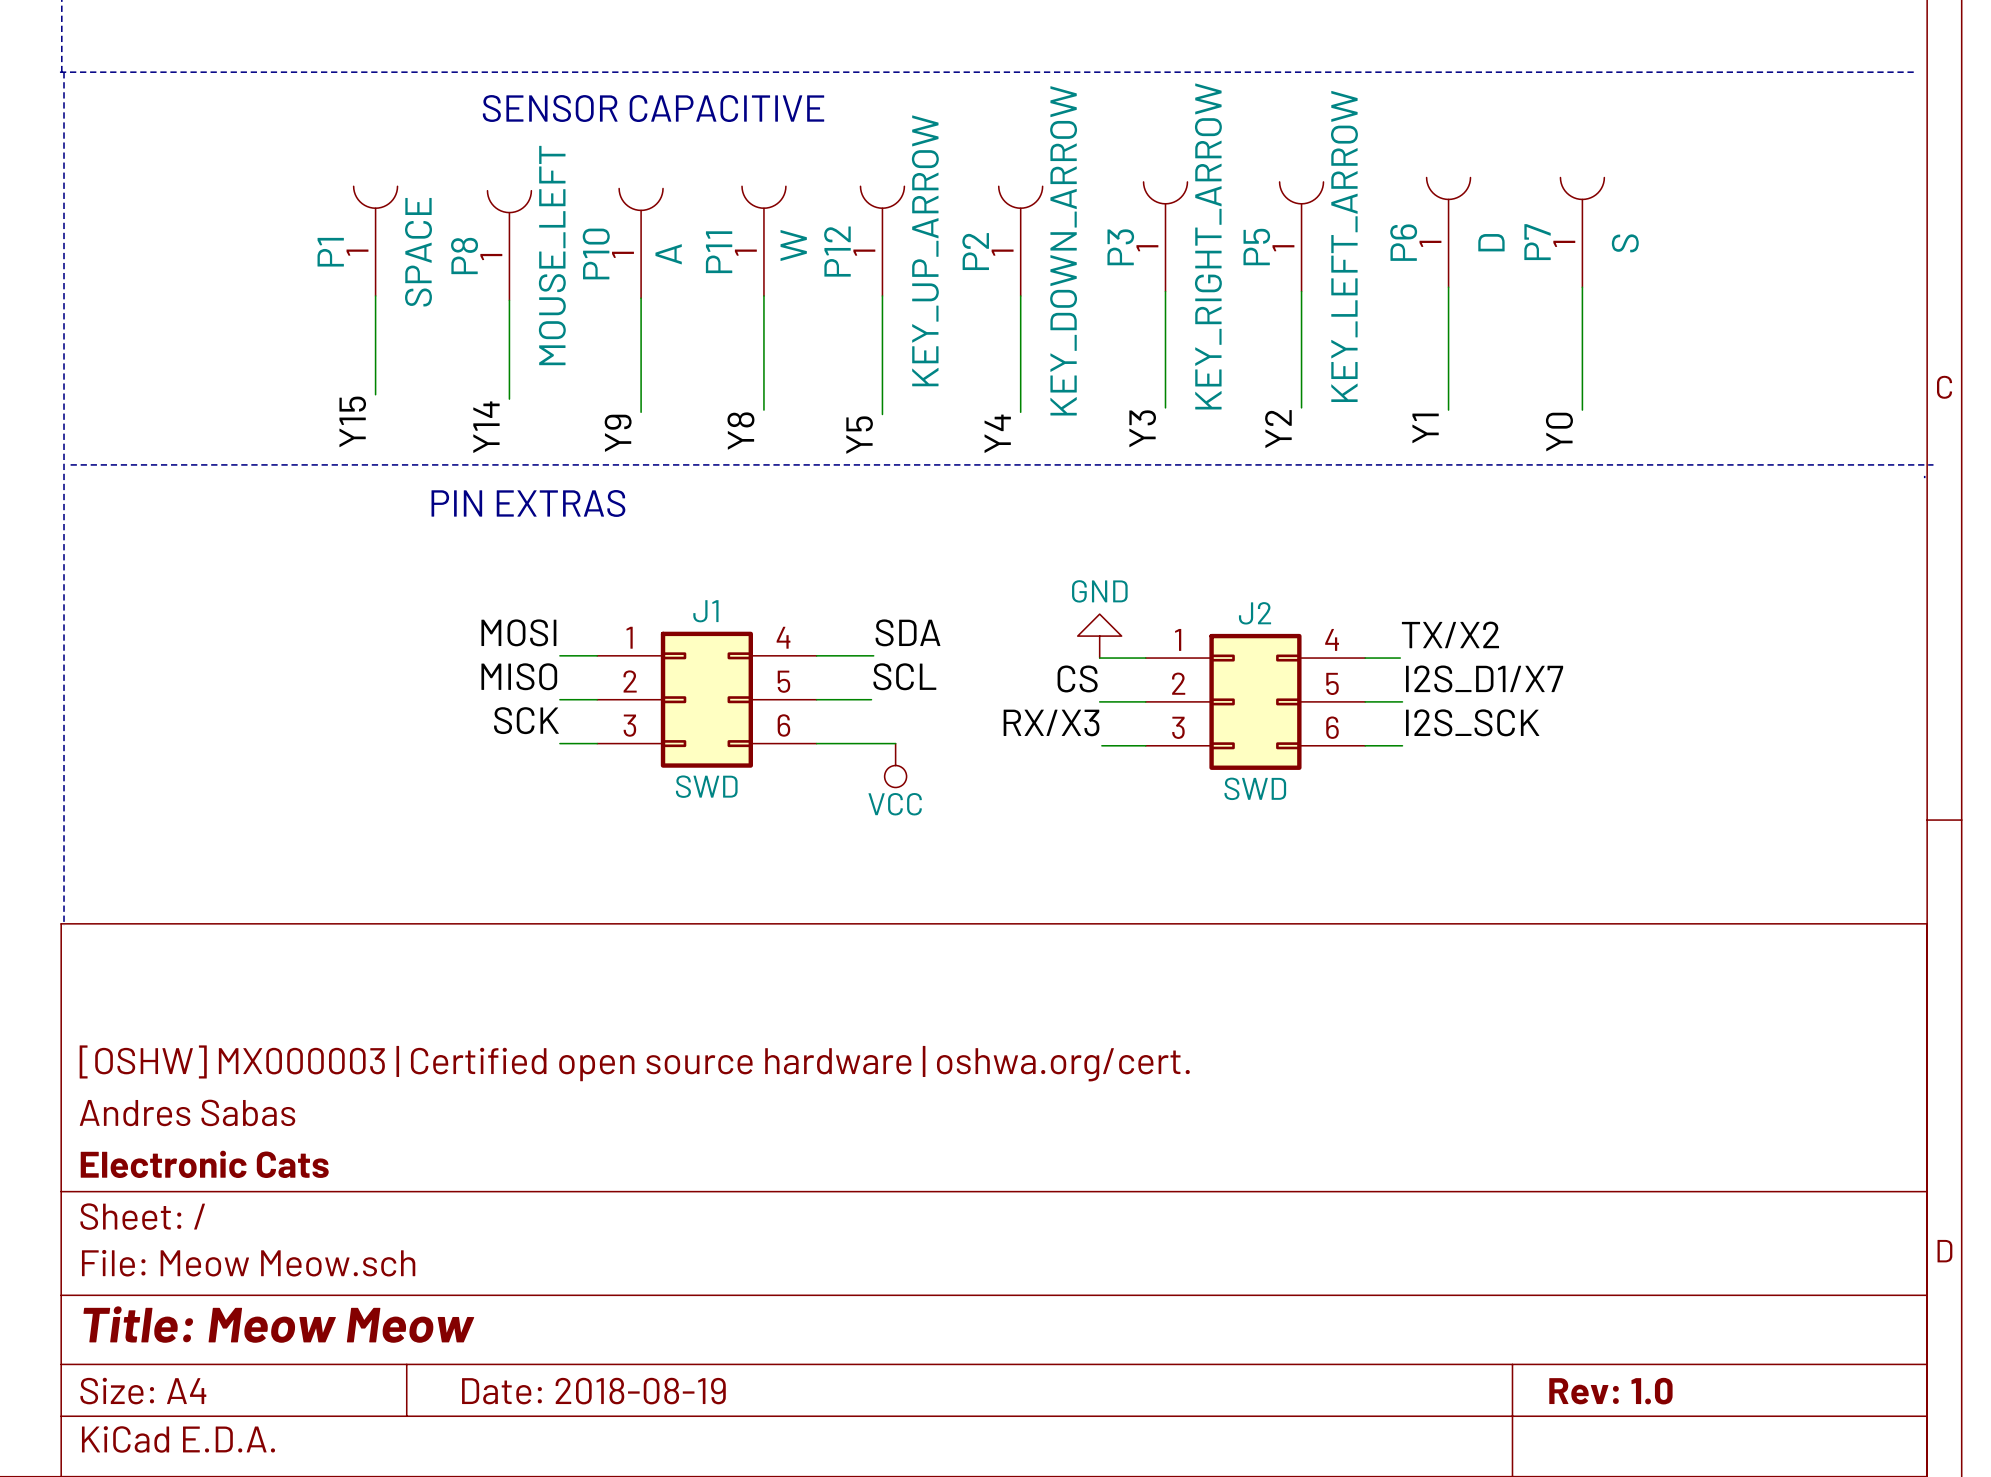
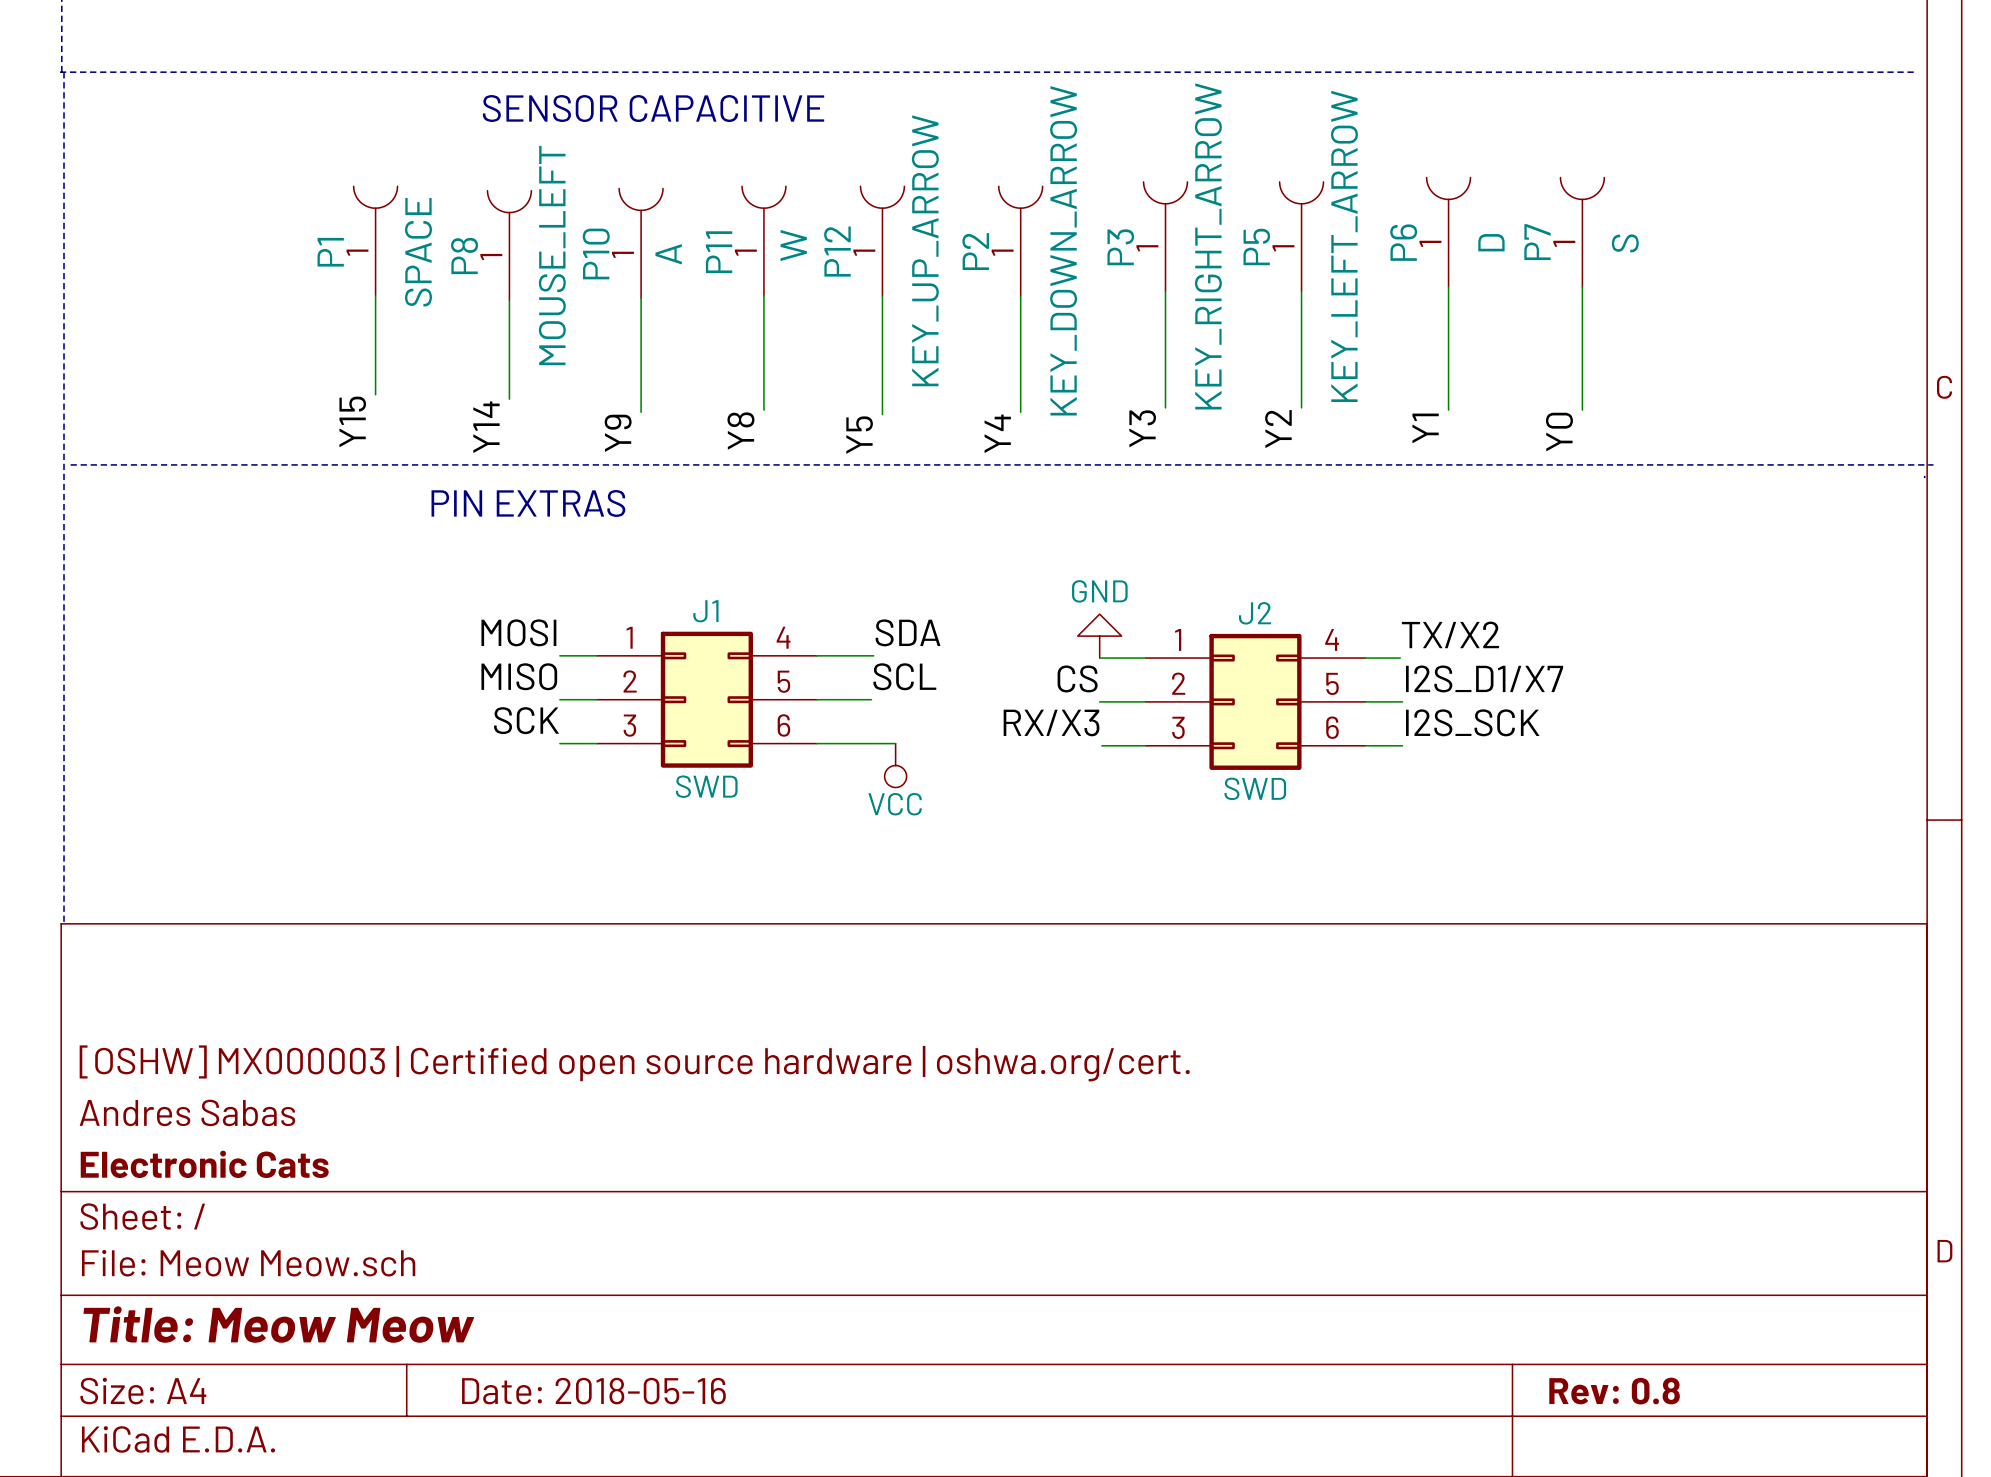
title block: Date: 2018-08-19 (593, 1391) -> Date: 2018-05-16 (593, 1391)
title block: Rev: 1.0 (1610, 1391) -> Rev: 0.8 (1614, 1391)

